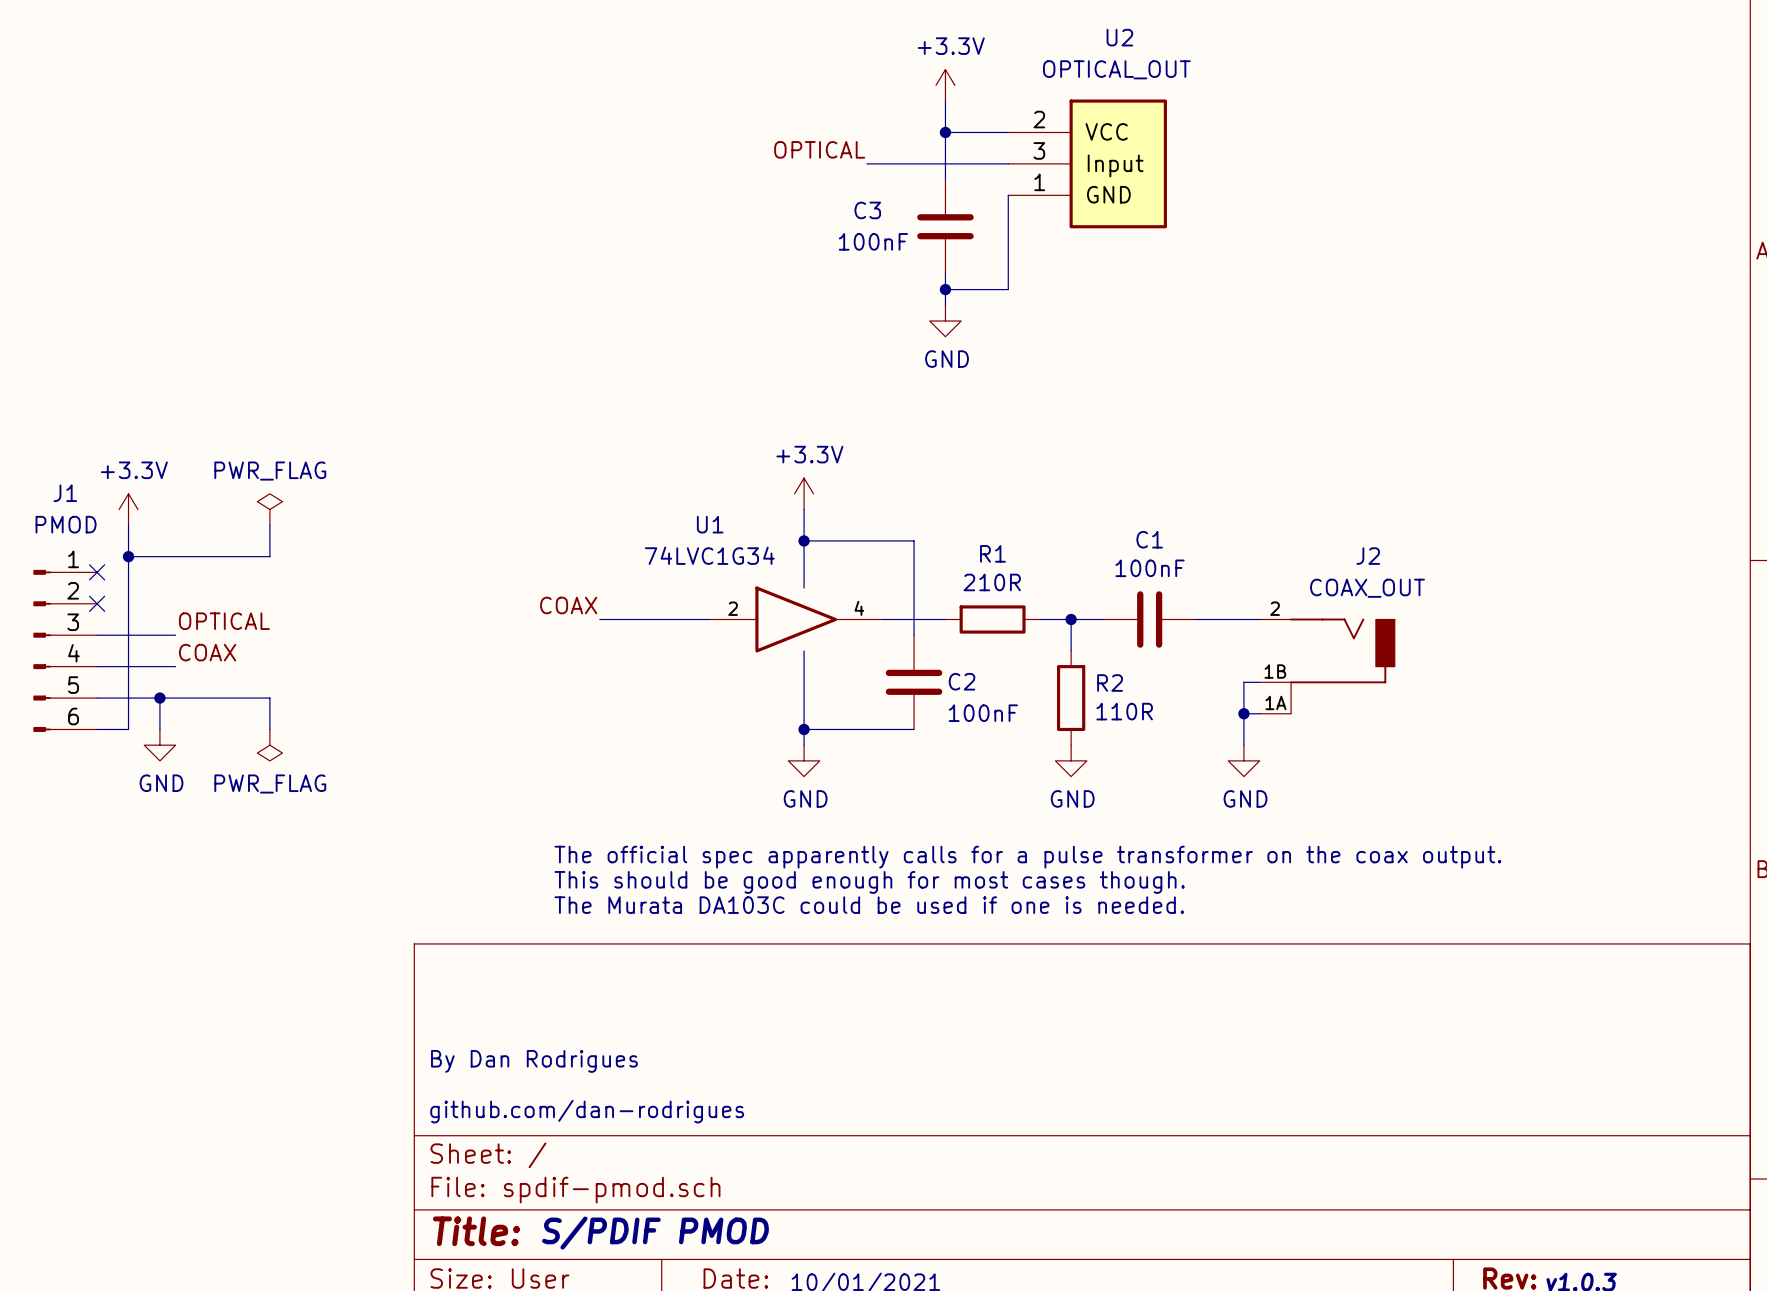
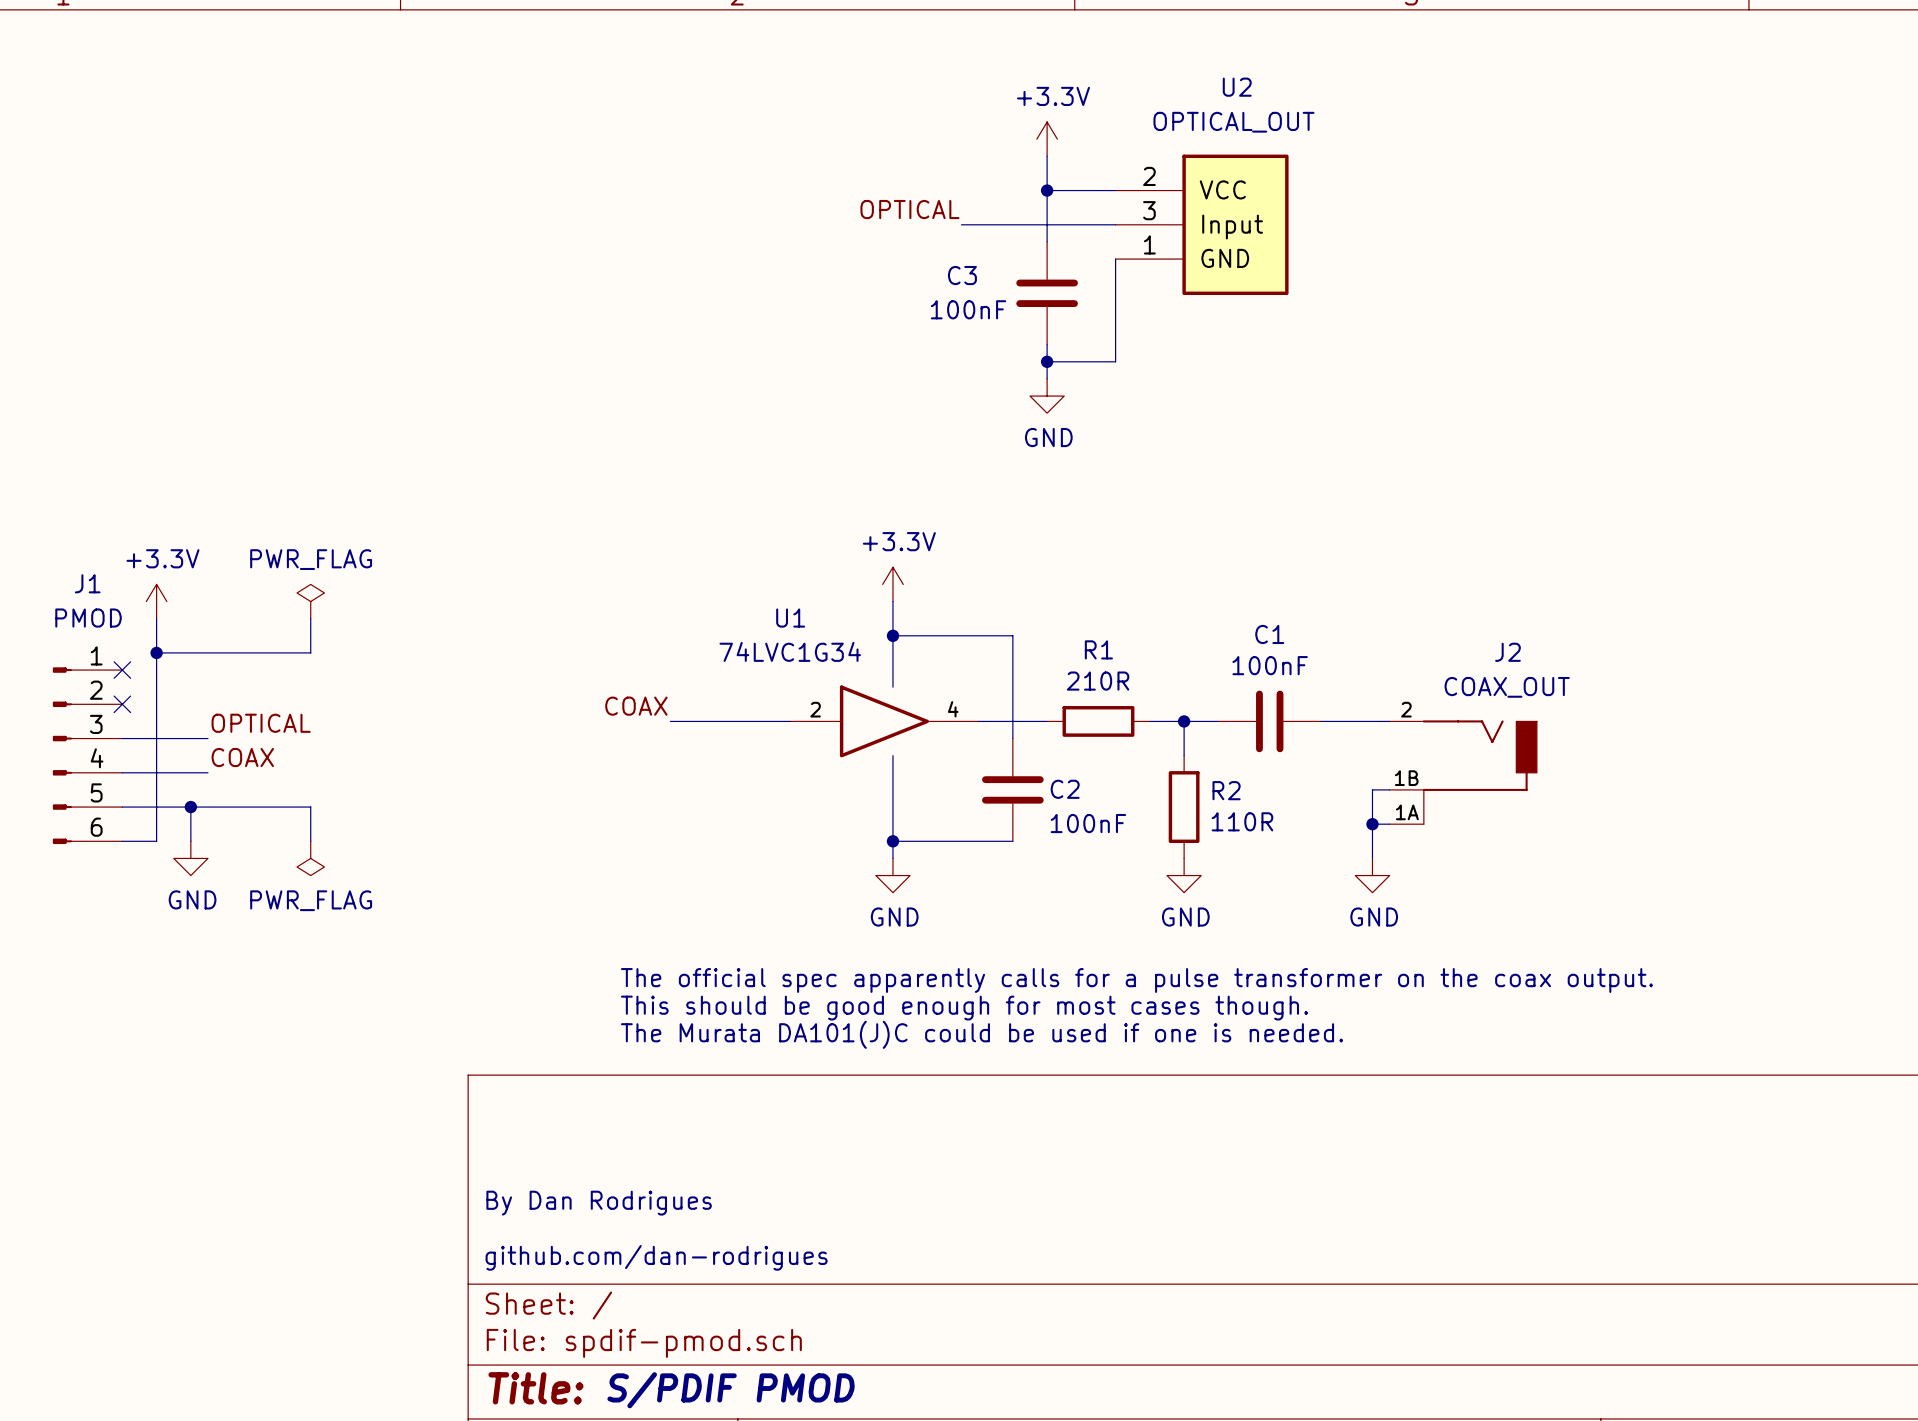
text: The Murata DA103C could be used if one is needed. (869, 905) -> The Murata DA101(J)C could be used if one is needed. (981, 1034)

